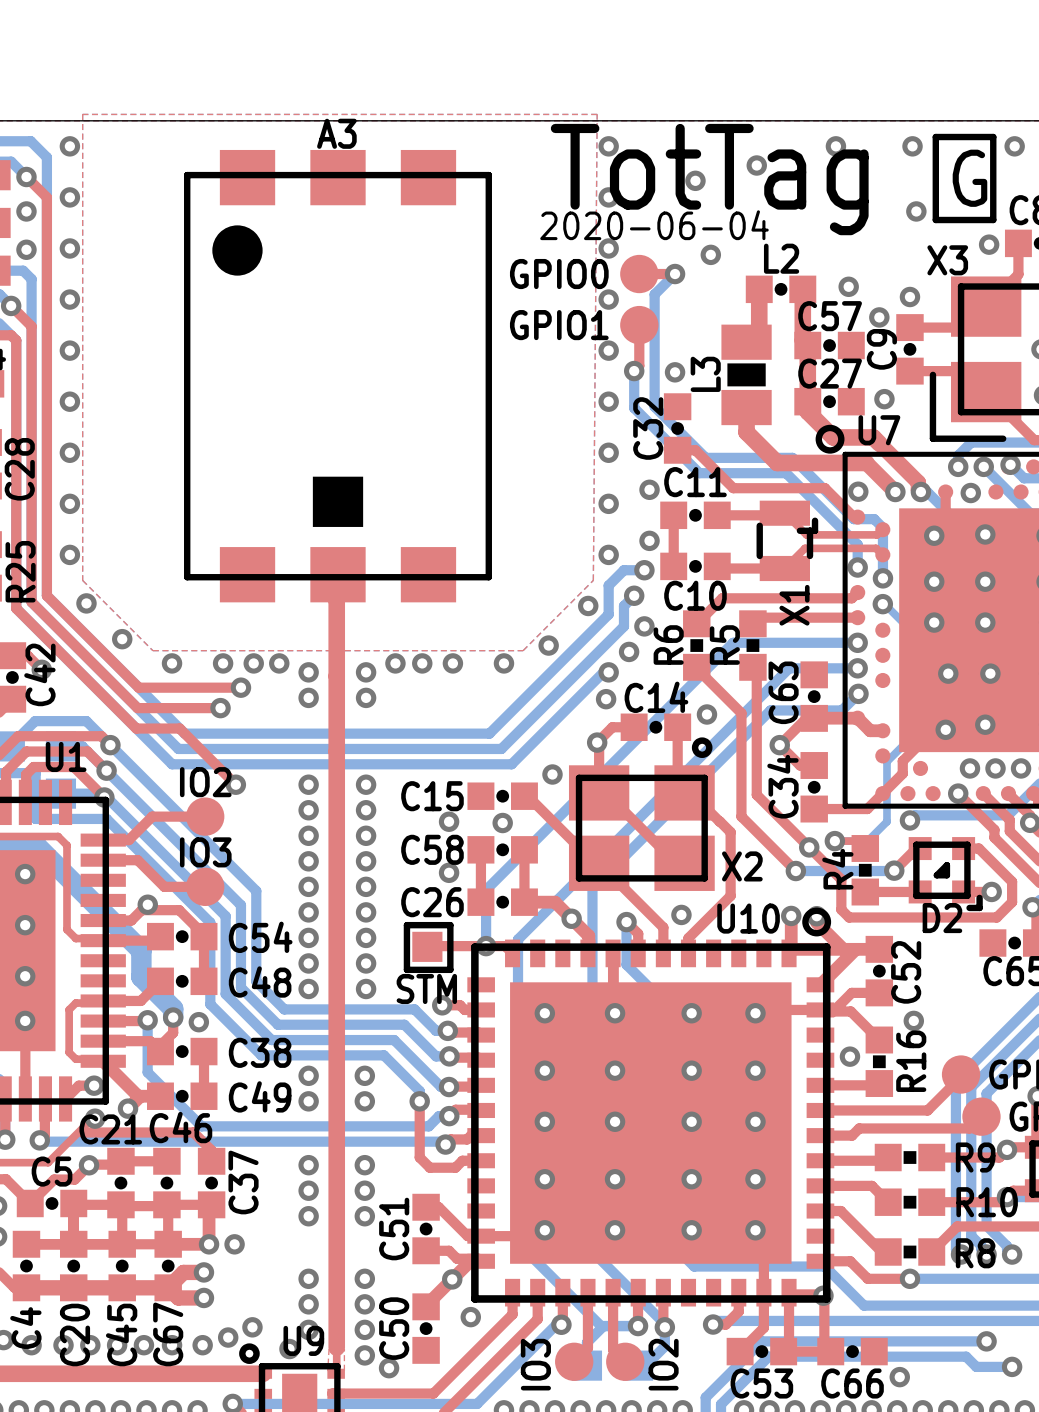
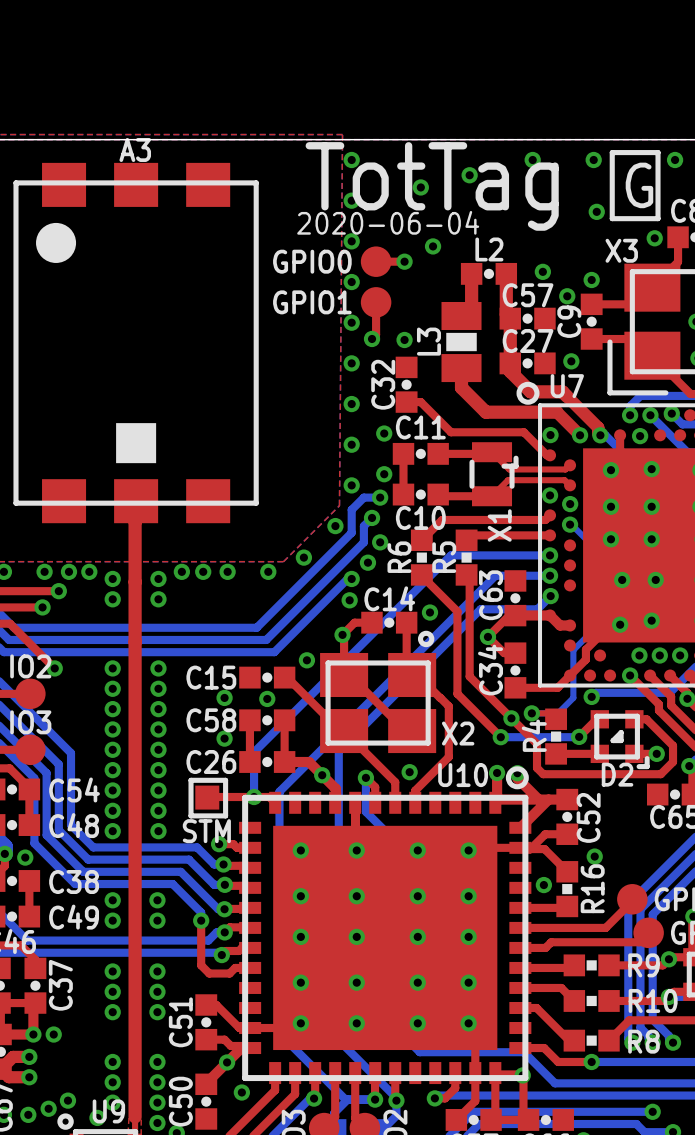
bottom track: (675, 274) (654, 294) (654, 406) (705, 457) (792, 457) (853, 519) (874, 519) (882, 527) (882, 578) -> none
bottom track: (634, 371) (634, 408) (699, 473) (786, 473) (857, 544) (857, 567) -> none

